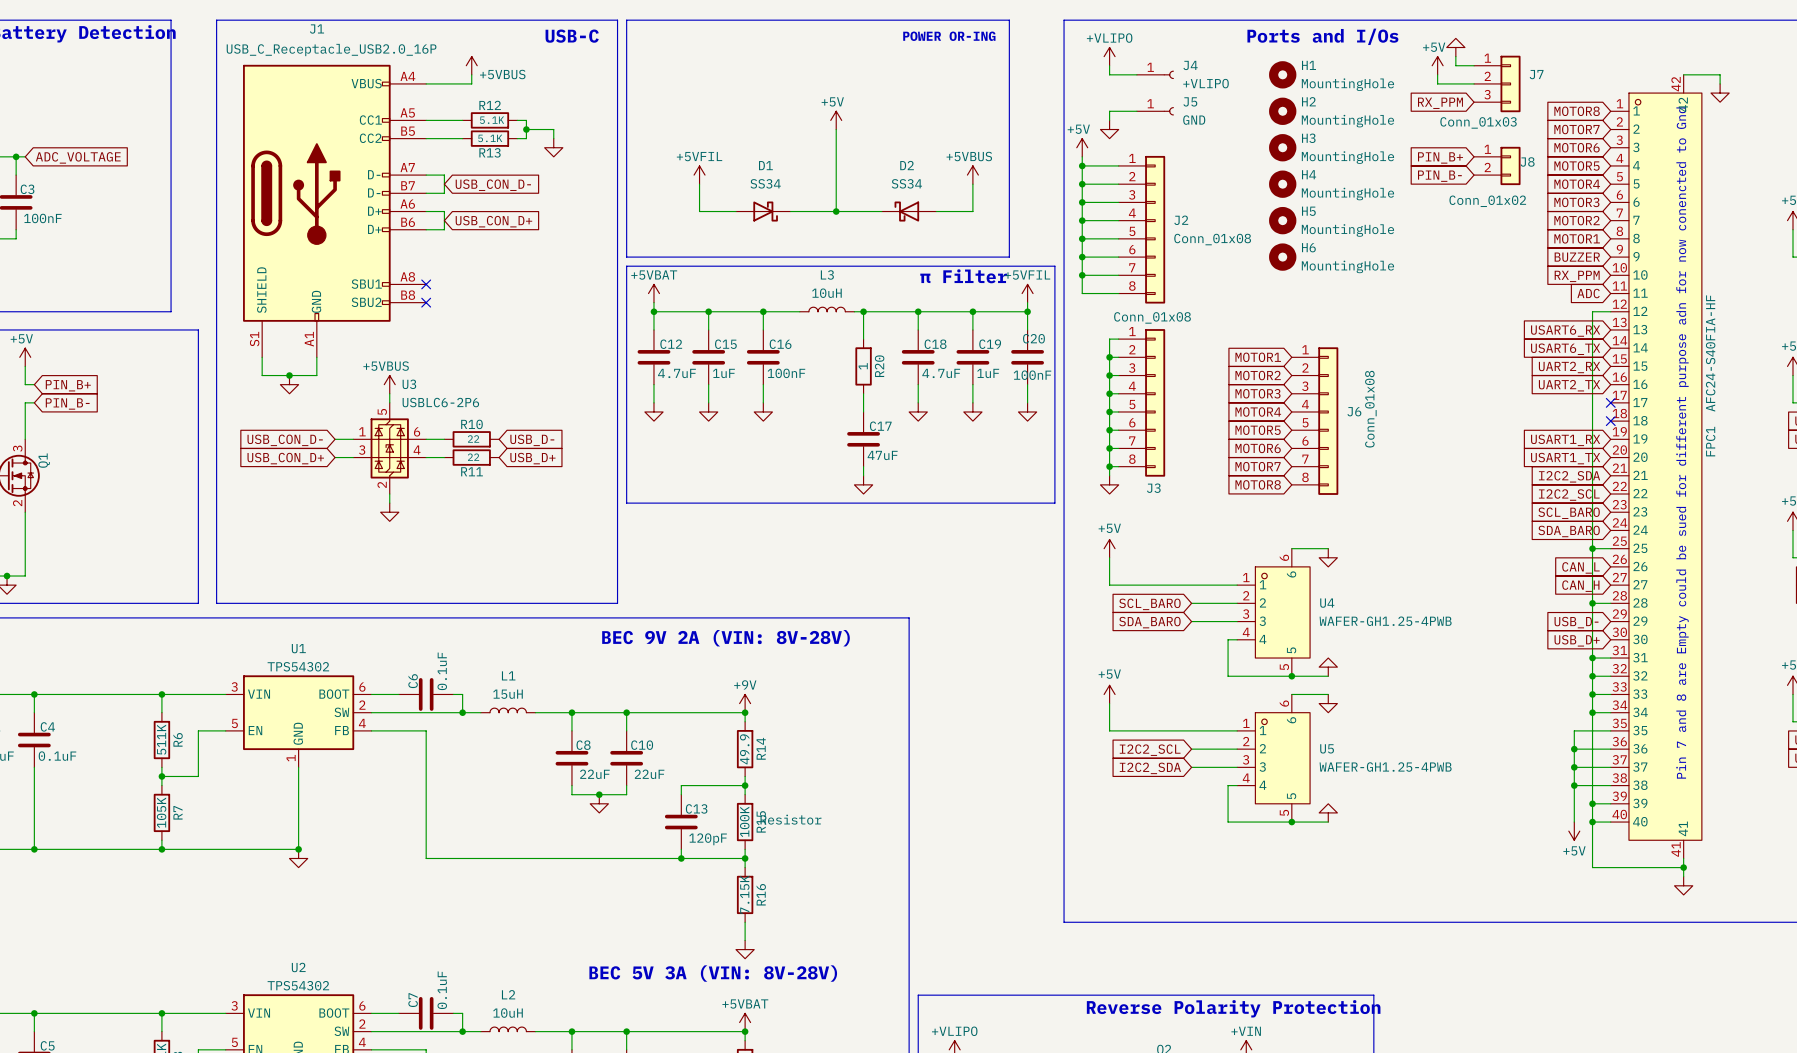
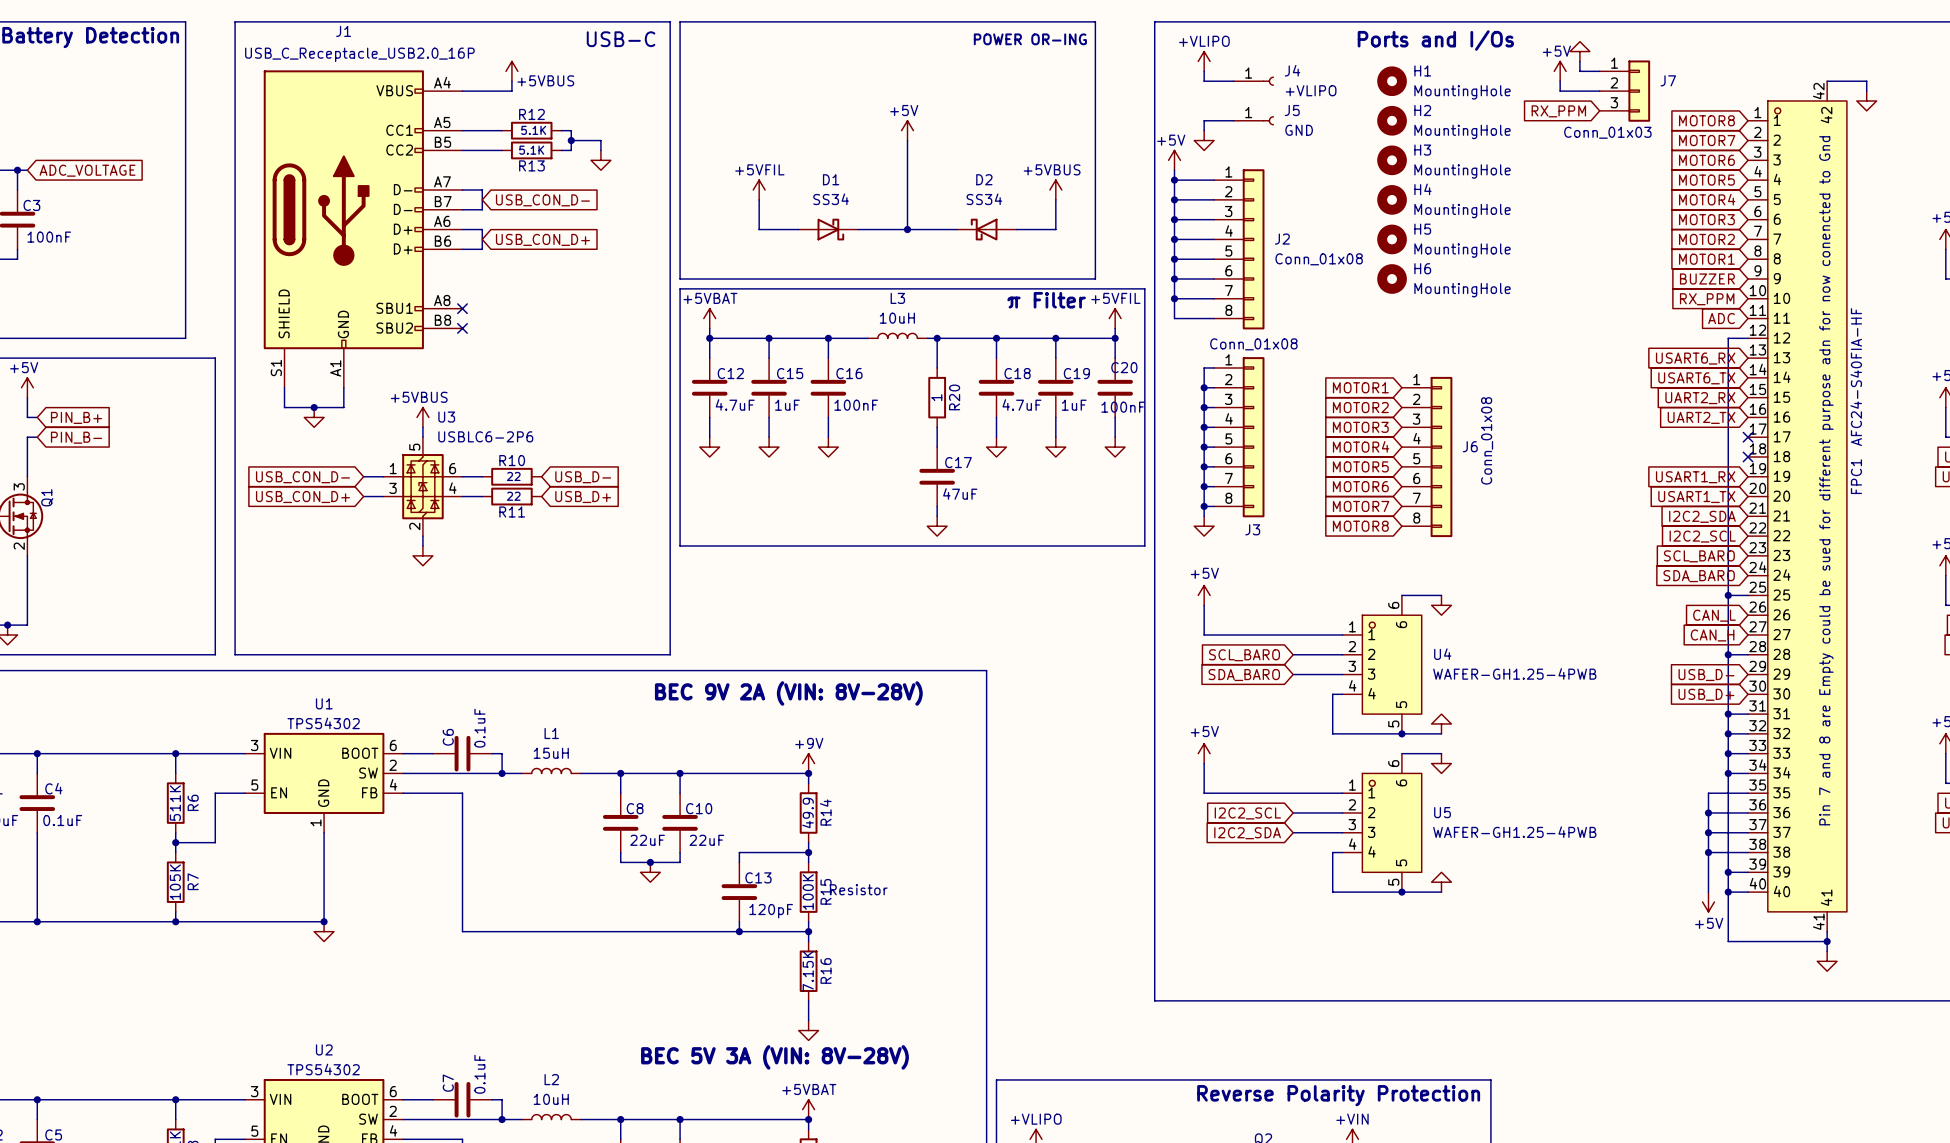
global label: PIN_B+ (1440, 157) -> none
J8: Conn_01x02 (1497, 165) -> none
global label: PIN_B- (1439, 176) -> none

